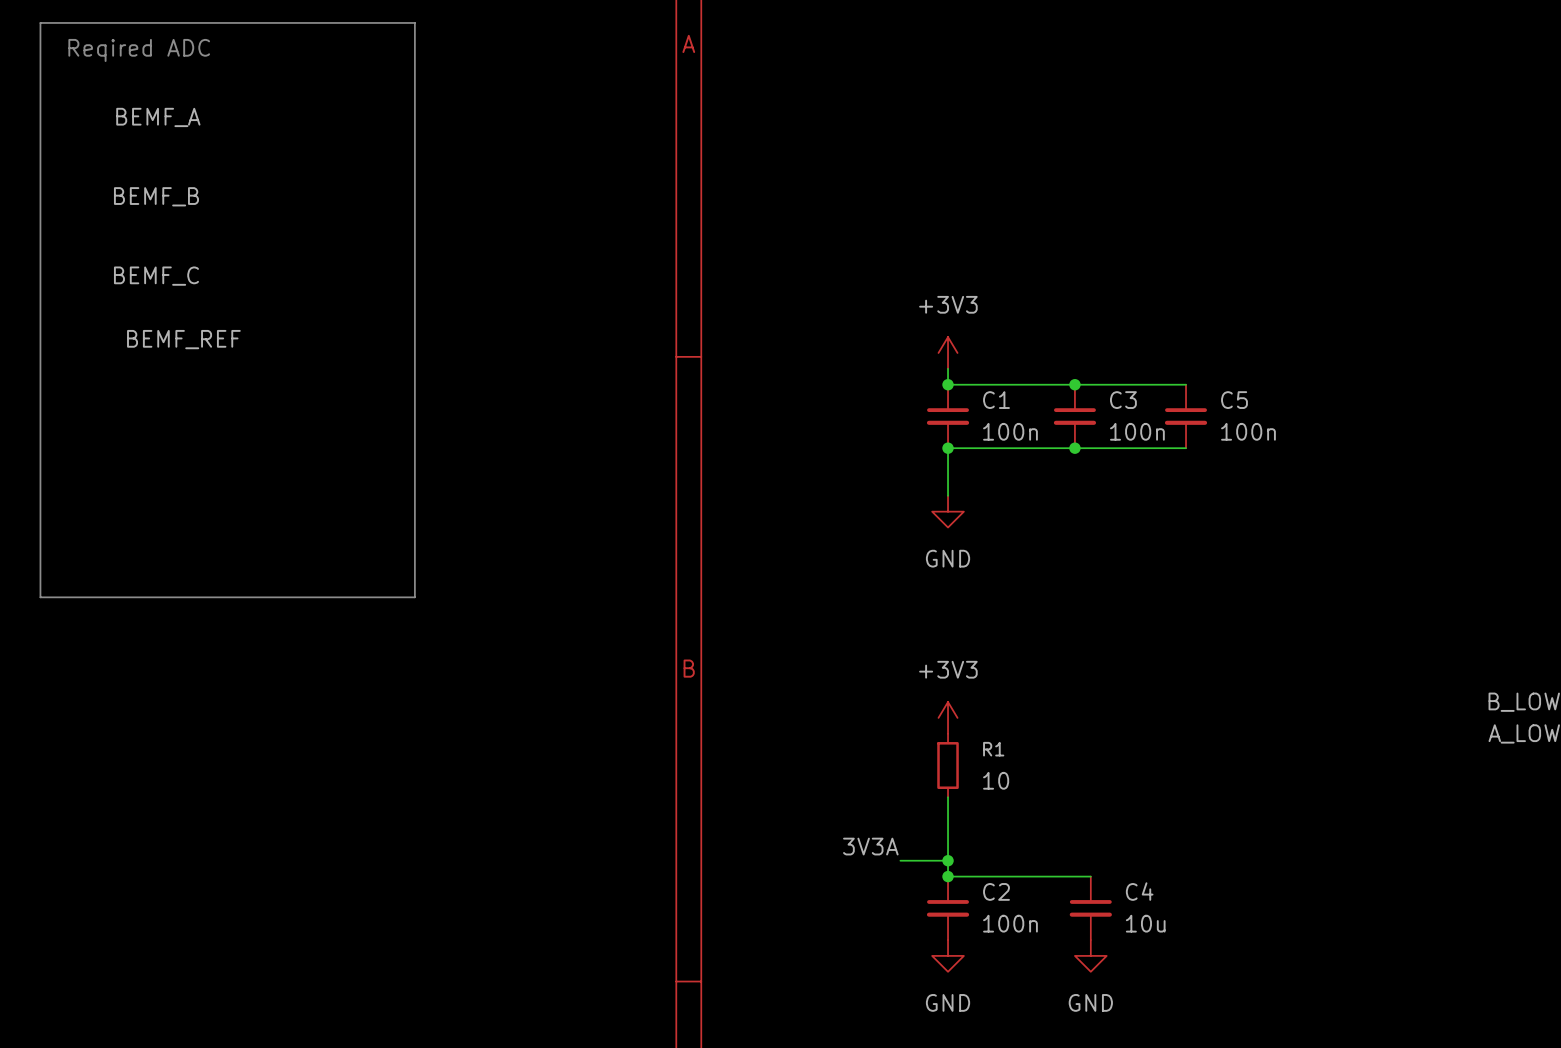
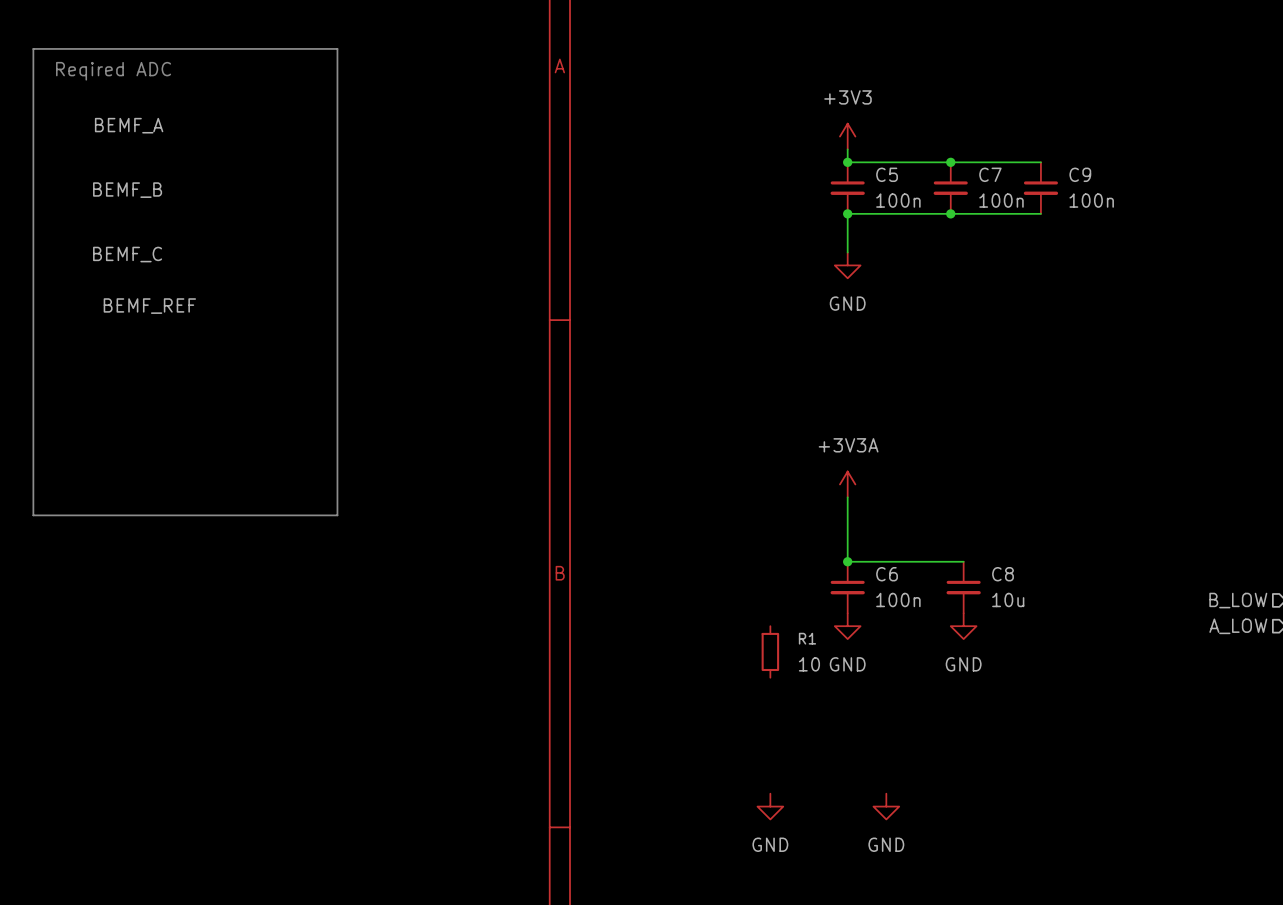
junction: none -> (847, 162)
junction: none -> (950, 162)
C7: none -> 100n (950, 188)
C9: none -> 100n (1040, 188)
junction: none -> (847, 213)
junction: none -> (950, 213)
power symbol: none -> GND (847, 265)
power symbol position: +3V3 (948, 352) -> +3V3 (847, 136)
wire: (948, 368) (948, 384) (1186, 384) -> (847, 149) (847, 162) (1040, 162)
junction: (948, 384) -> none
junction: (1074, 384) -> none
C1: 100n (948, 416) -> none
C3: 100n (1074, 416) -> none
C5 position: (1186, 416) -> (847, 188)
junction: (948, 448) -> none
junction: (1074, 448) -> none
wire: (1186, 448) (948, 448) (948, 495) -> (1040, 213) (847, 213) (847, 252)
power symbol: GND (948, 511) -> none
power symbol: none -> +3V3A (847, 484)
junction: none -> (847, 561)
C6: none -> 100n (847, 587)
C8: none -> 10u (963, 587)
power symbol: +3V3 (948, 717) -> none
power symbol: none -> GND (847, 626)
power symbol: none -> GND (963, 626)
wire: (948, 797) (948, 876) (1090, 876) -> (847, 497) (847, 561) (963, 561)
label: 3V3A (870, 846) -> none
wire: (900, 860) (948, 860) -> none
junction: (948, 860) -> none
junction: (948, 876) -> none
C2: 100n (948, 908) -> none
C4: 10u (1090, 908) -> none

